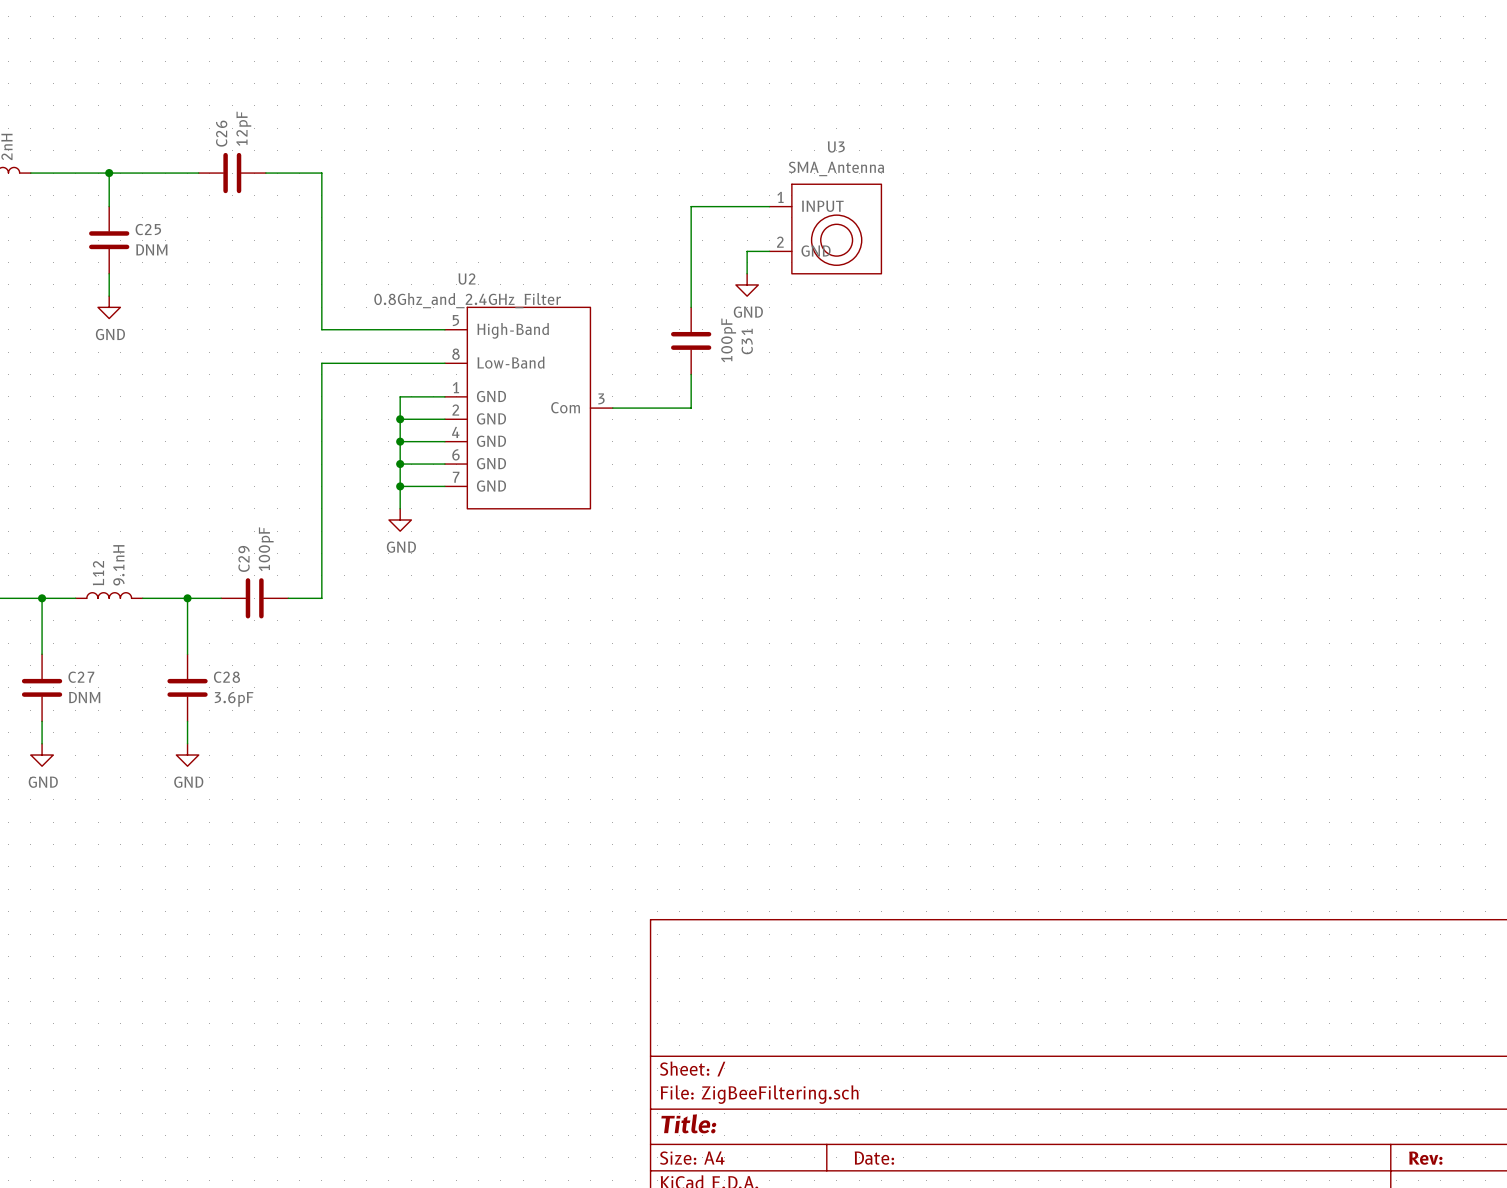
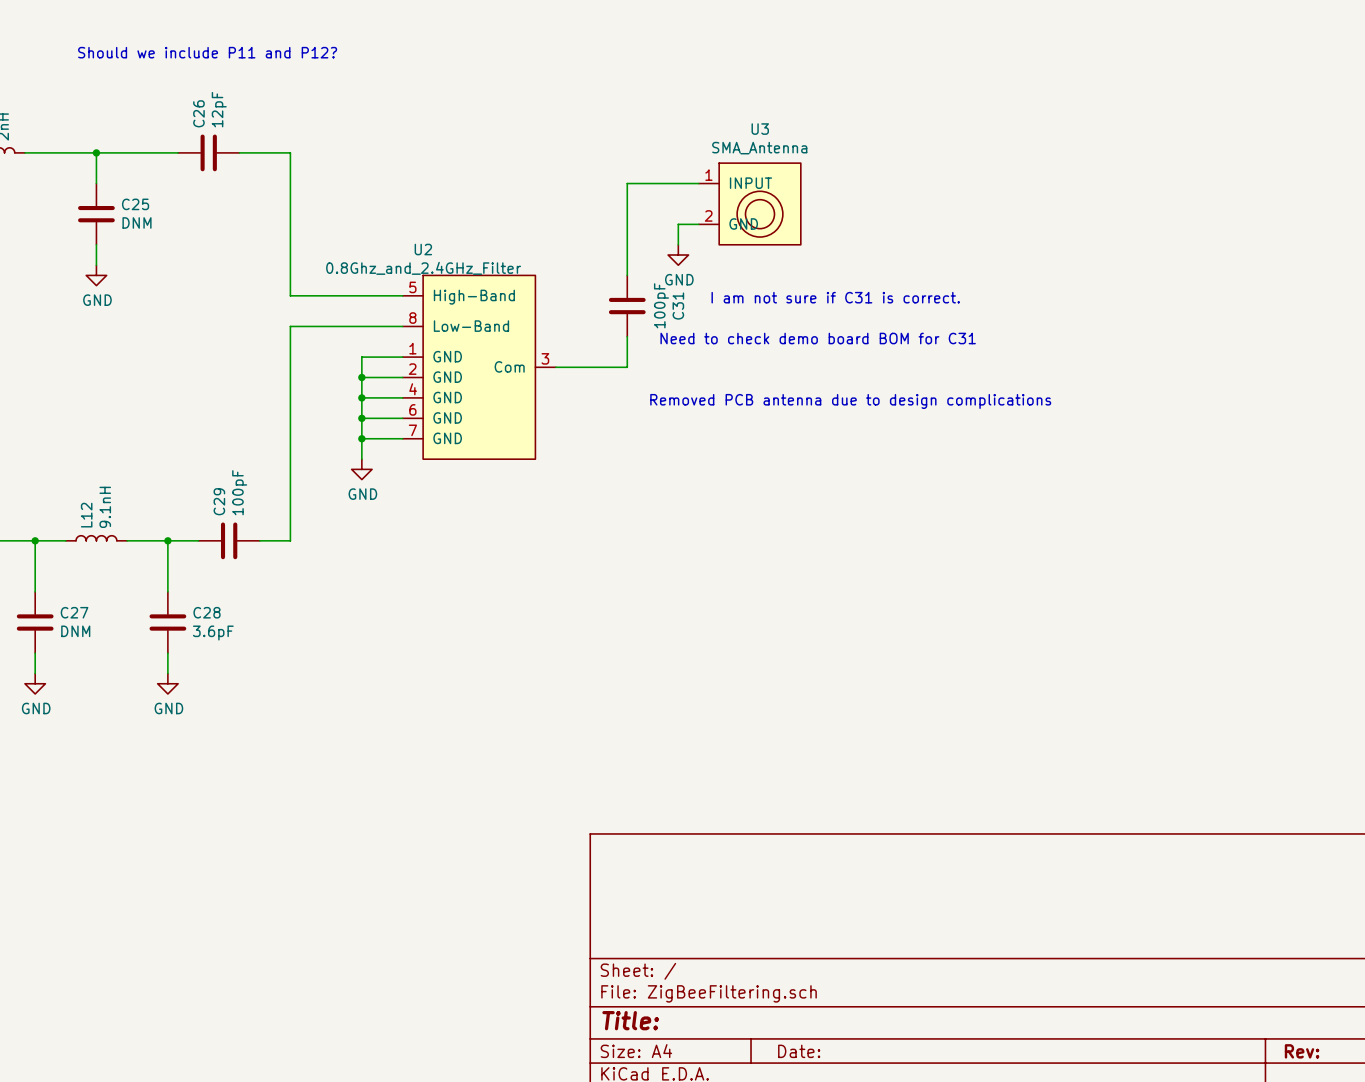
text: none -> Should we include P11 and P12? (207, 52)
text: none -> I am not sure if C31 is correct. (835, 297)
text: none -> Need to check demo board BOM for C31 (818, 338)
text: none -> Removed PCB antenna due to design complications (850, 401)

